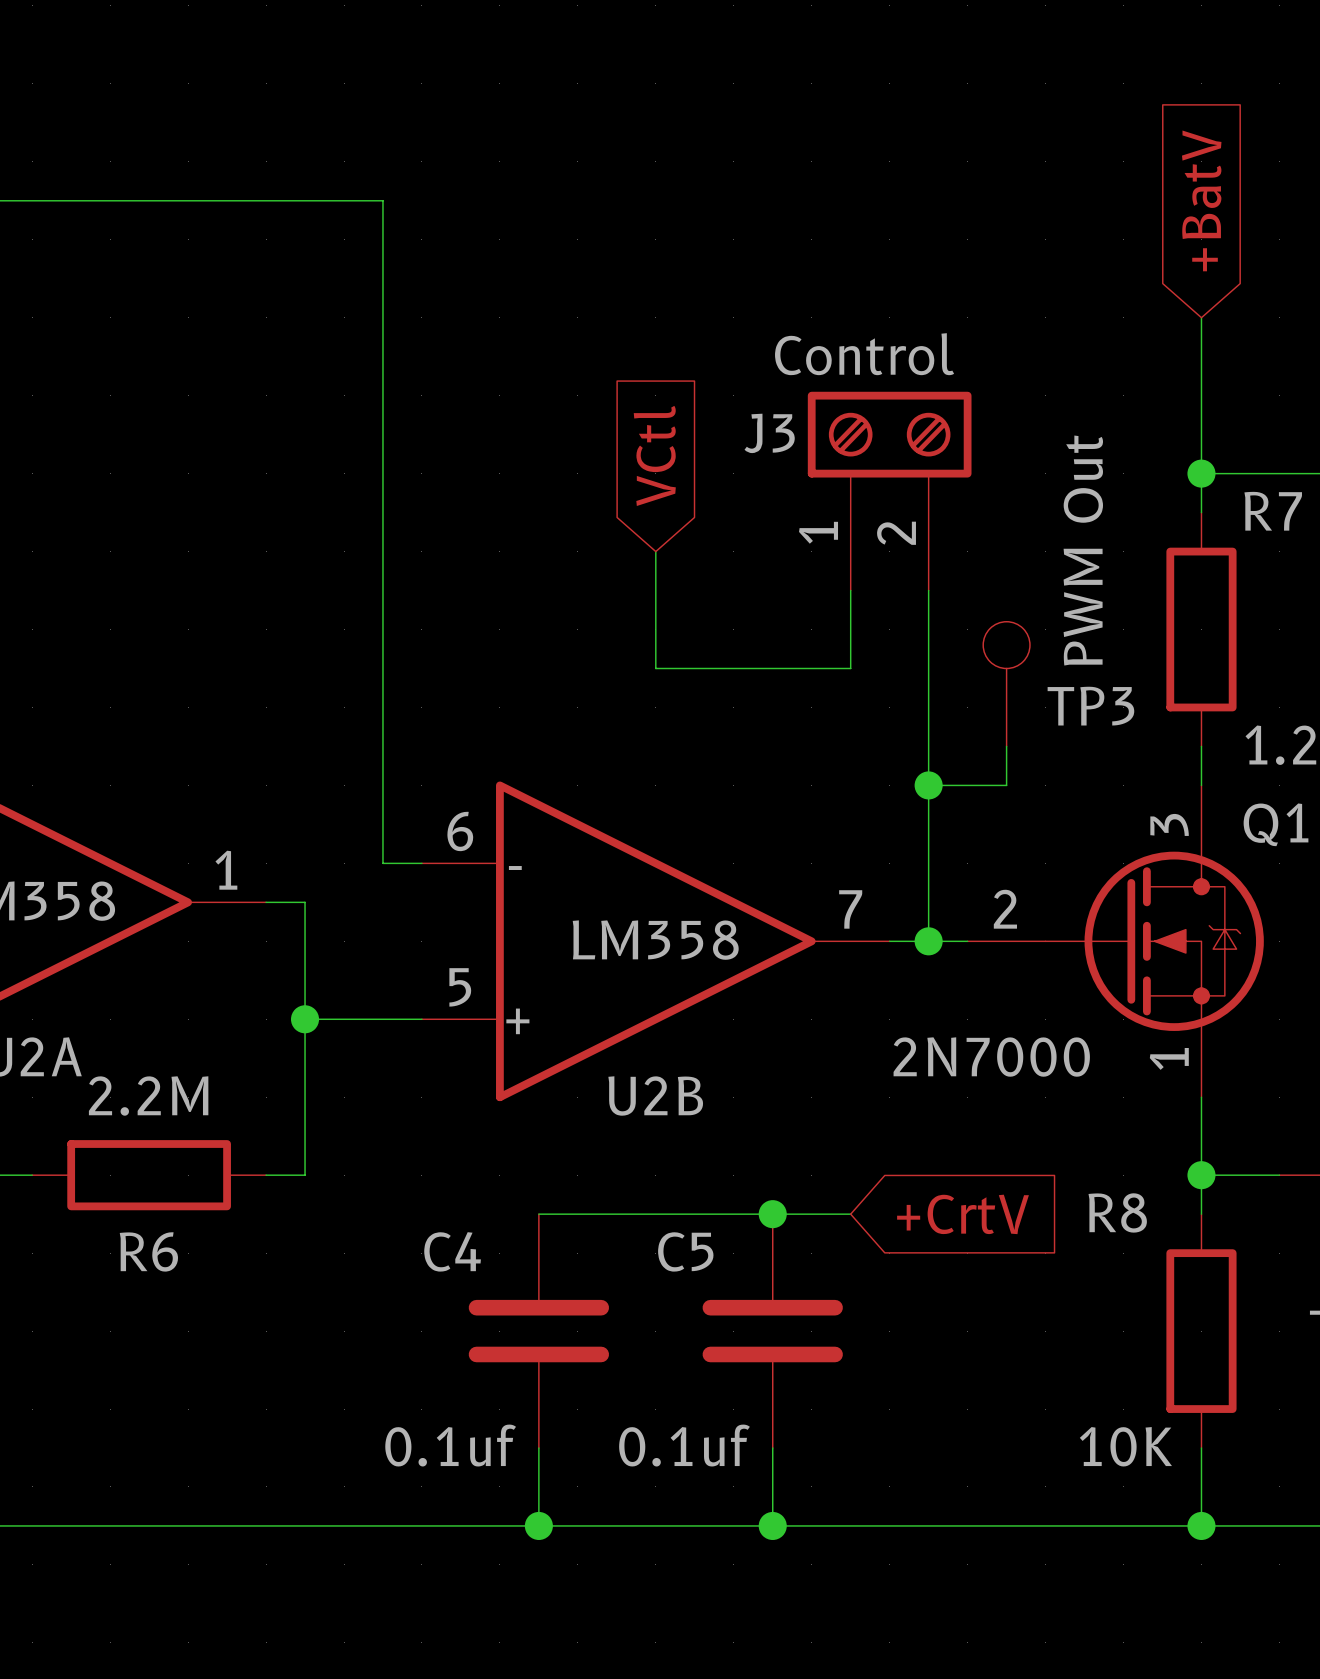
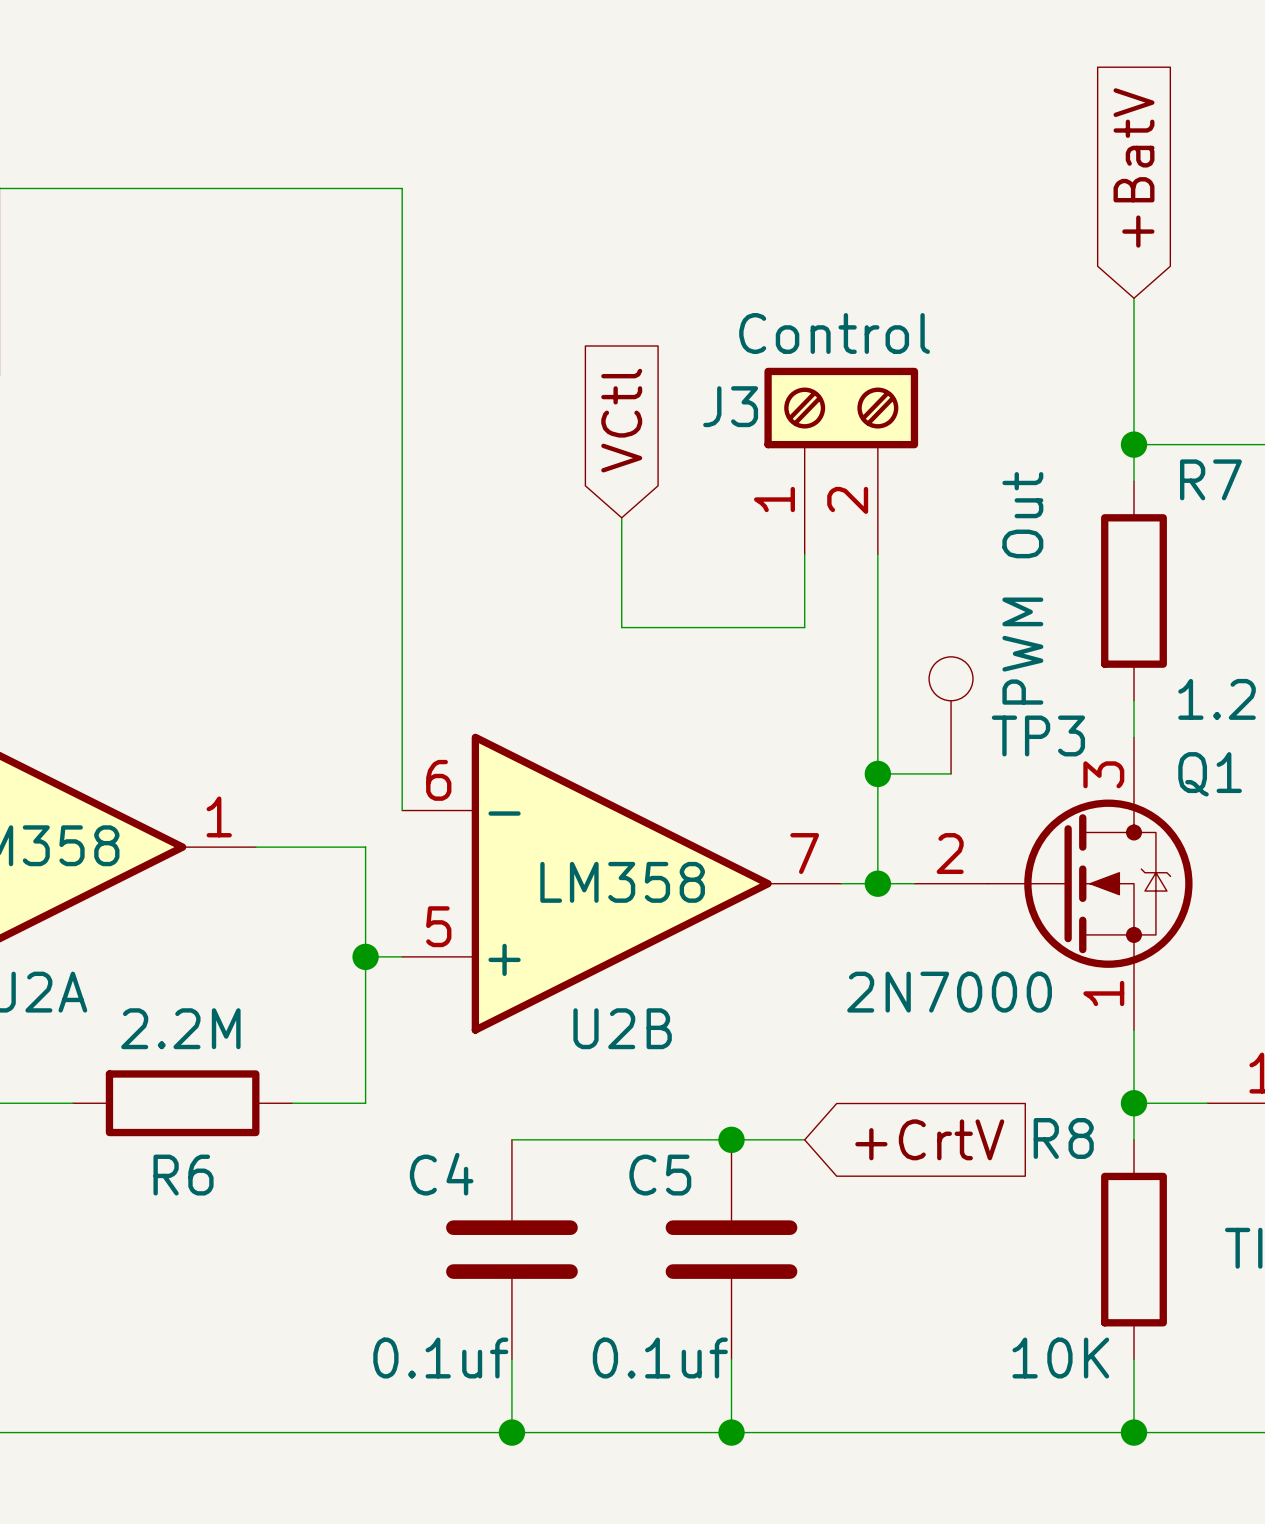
wire: (382, 200) (382, 863) (421, 863) -> (365, 188) (402, 188) (402, 810)
TP3 position: (1006, 684) -> (951, 715)
wire: (1006, 746) (1006, 785) (928, 785) -> none
junction position: (928, 785) -> (877, 773)
wire: (305, 902) (305, 1175) (266, 1175) -> (292, 847) (365, 847) (365, 1103) (292, 1103)
wire: (305, 1019) (382, 1019) -> (877, 773) (951, 773)
junction position: (305, 1019) -> (365, 956)
R6 position: (149, 1175) -> (182, 1103)

